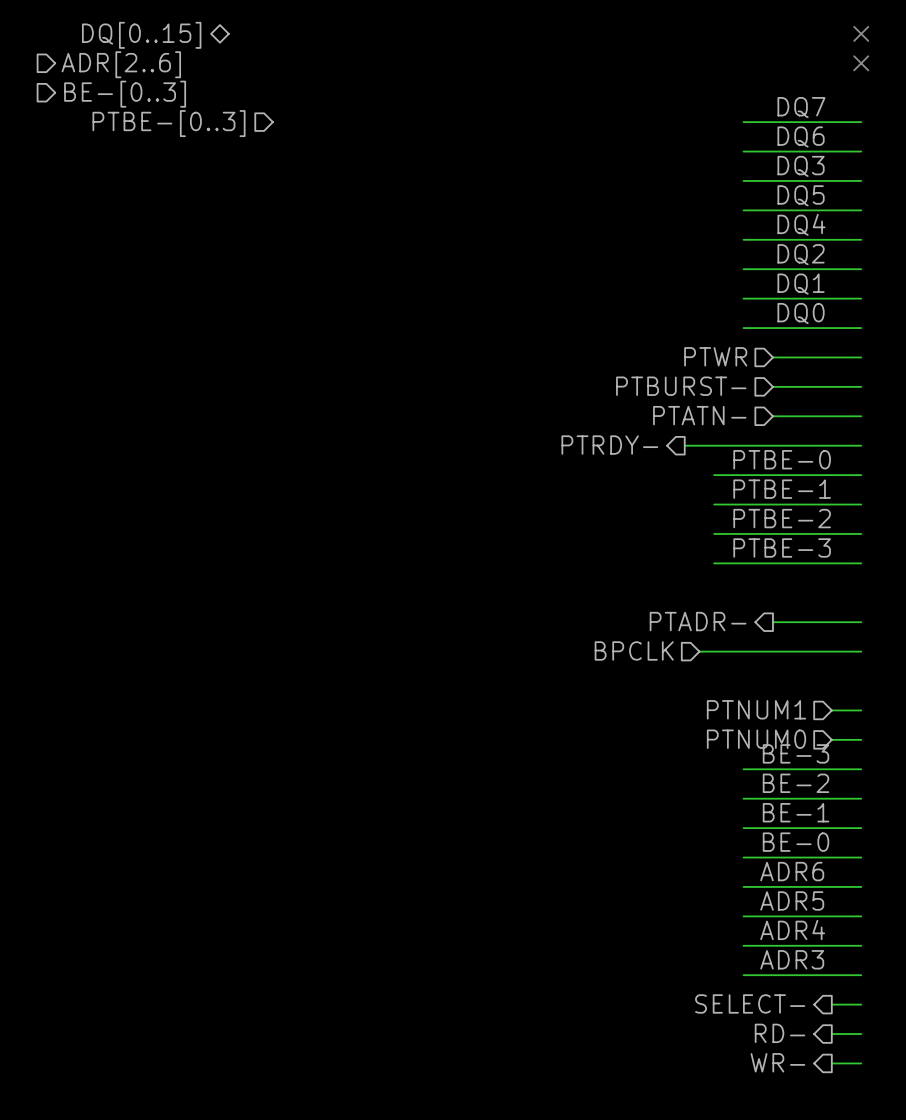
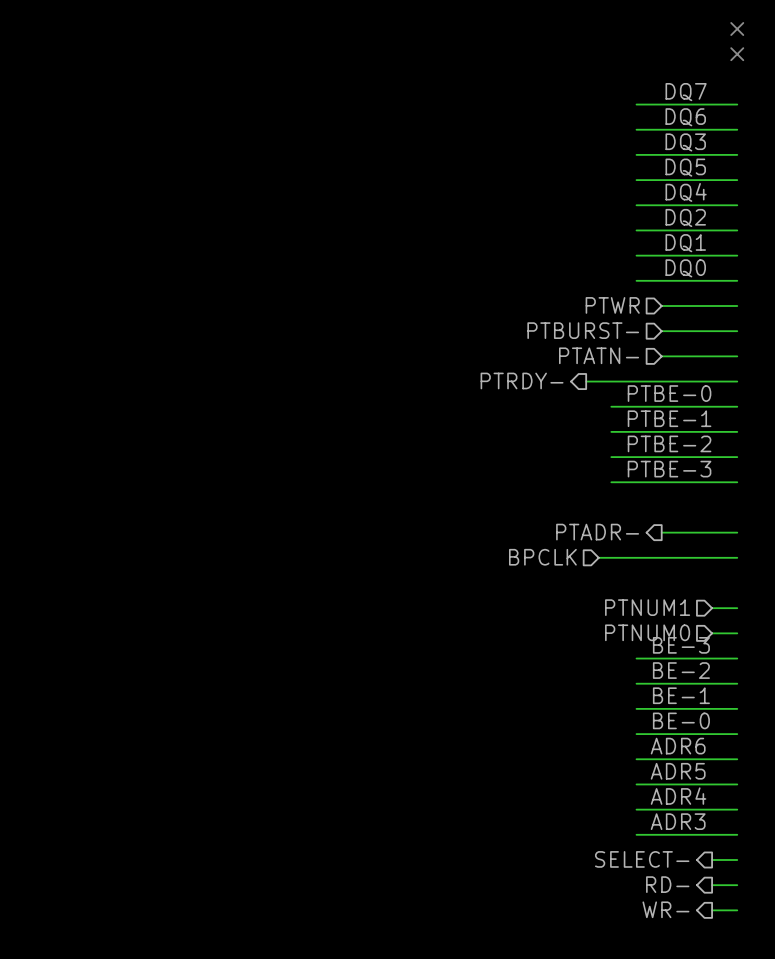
hierarchical label: DQ[0..15] (141, 35) -> none
hierarchical label: ADR[2..6] (121, 64) -> none
hierarchical label: BE-[0..3] (125, 94) -> none
hierarchical label: PTBE-[0..3] (169, 123) -> none

